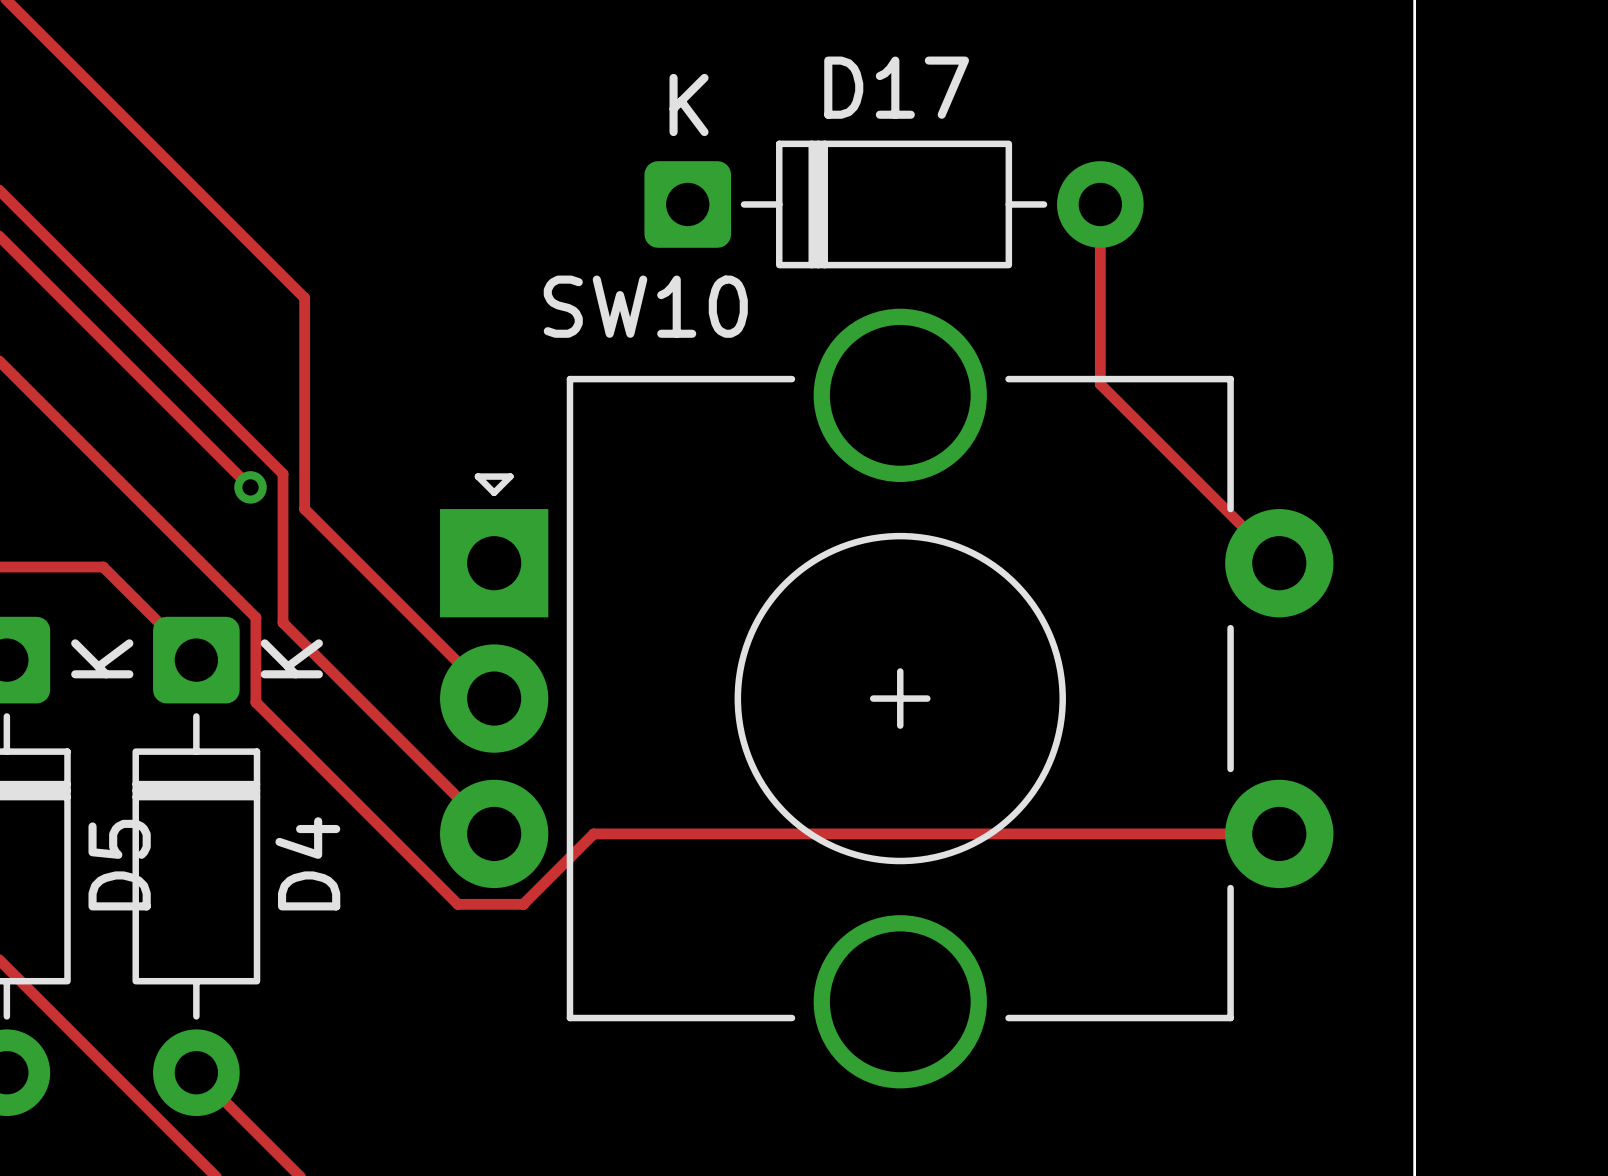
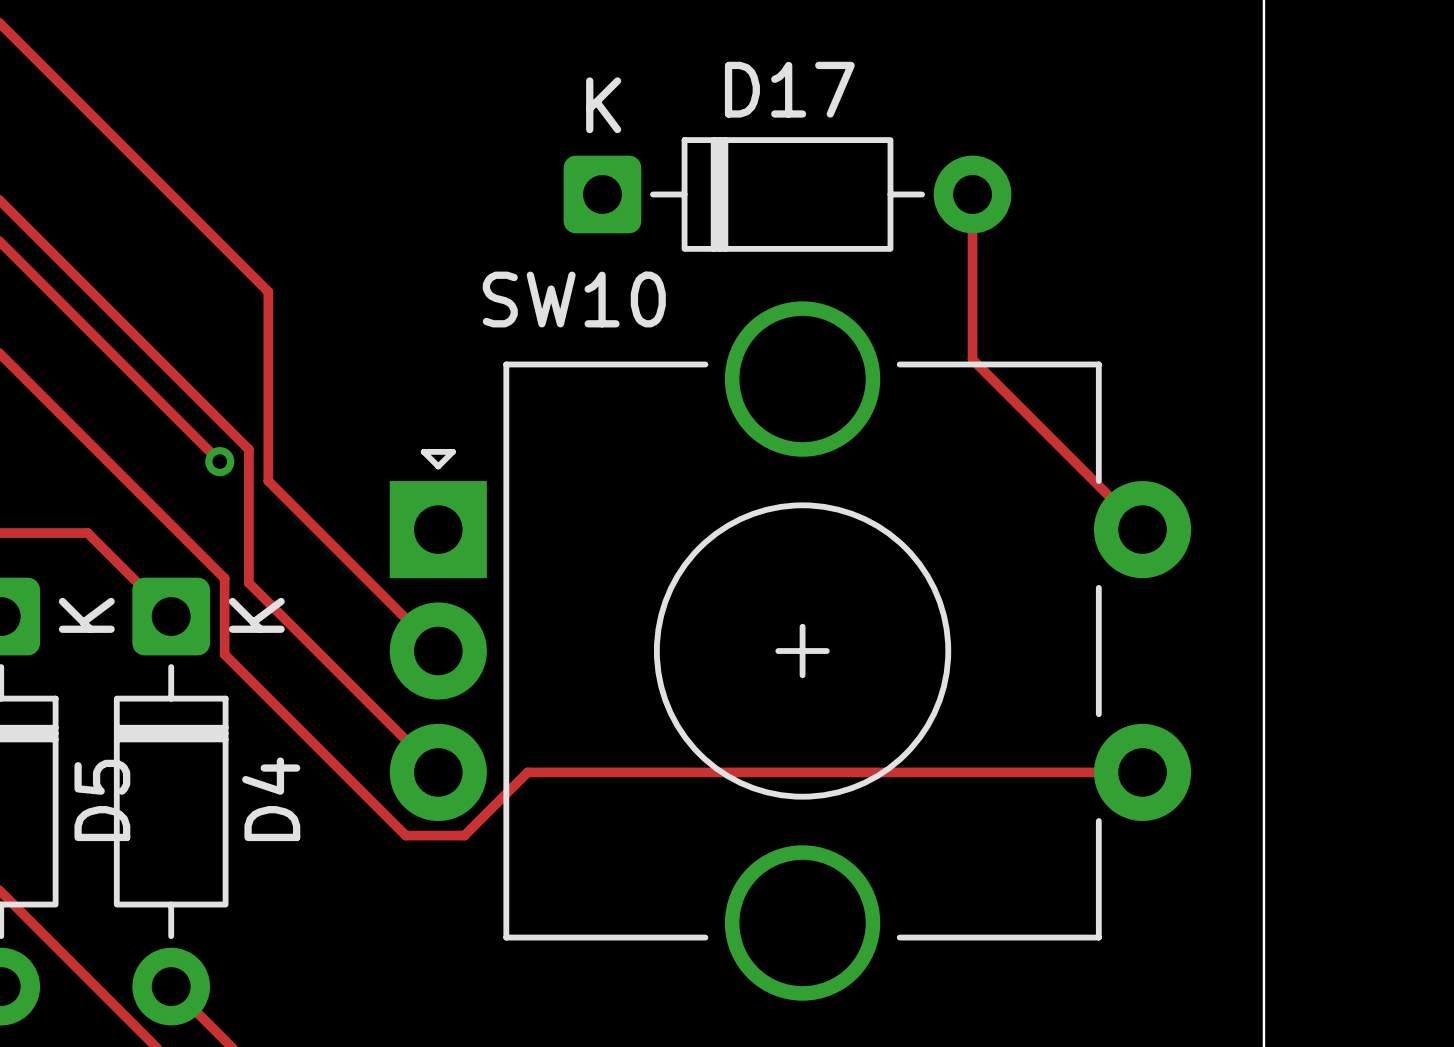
D17 position: (894, 204) -> (787, 194)
track: (1100, 204) (1100, 384) -> (972, 194) (972, 359) (982, 369)

